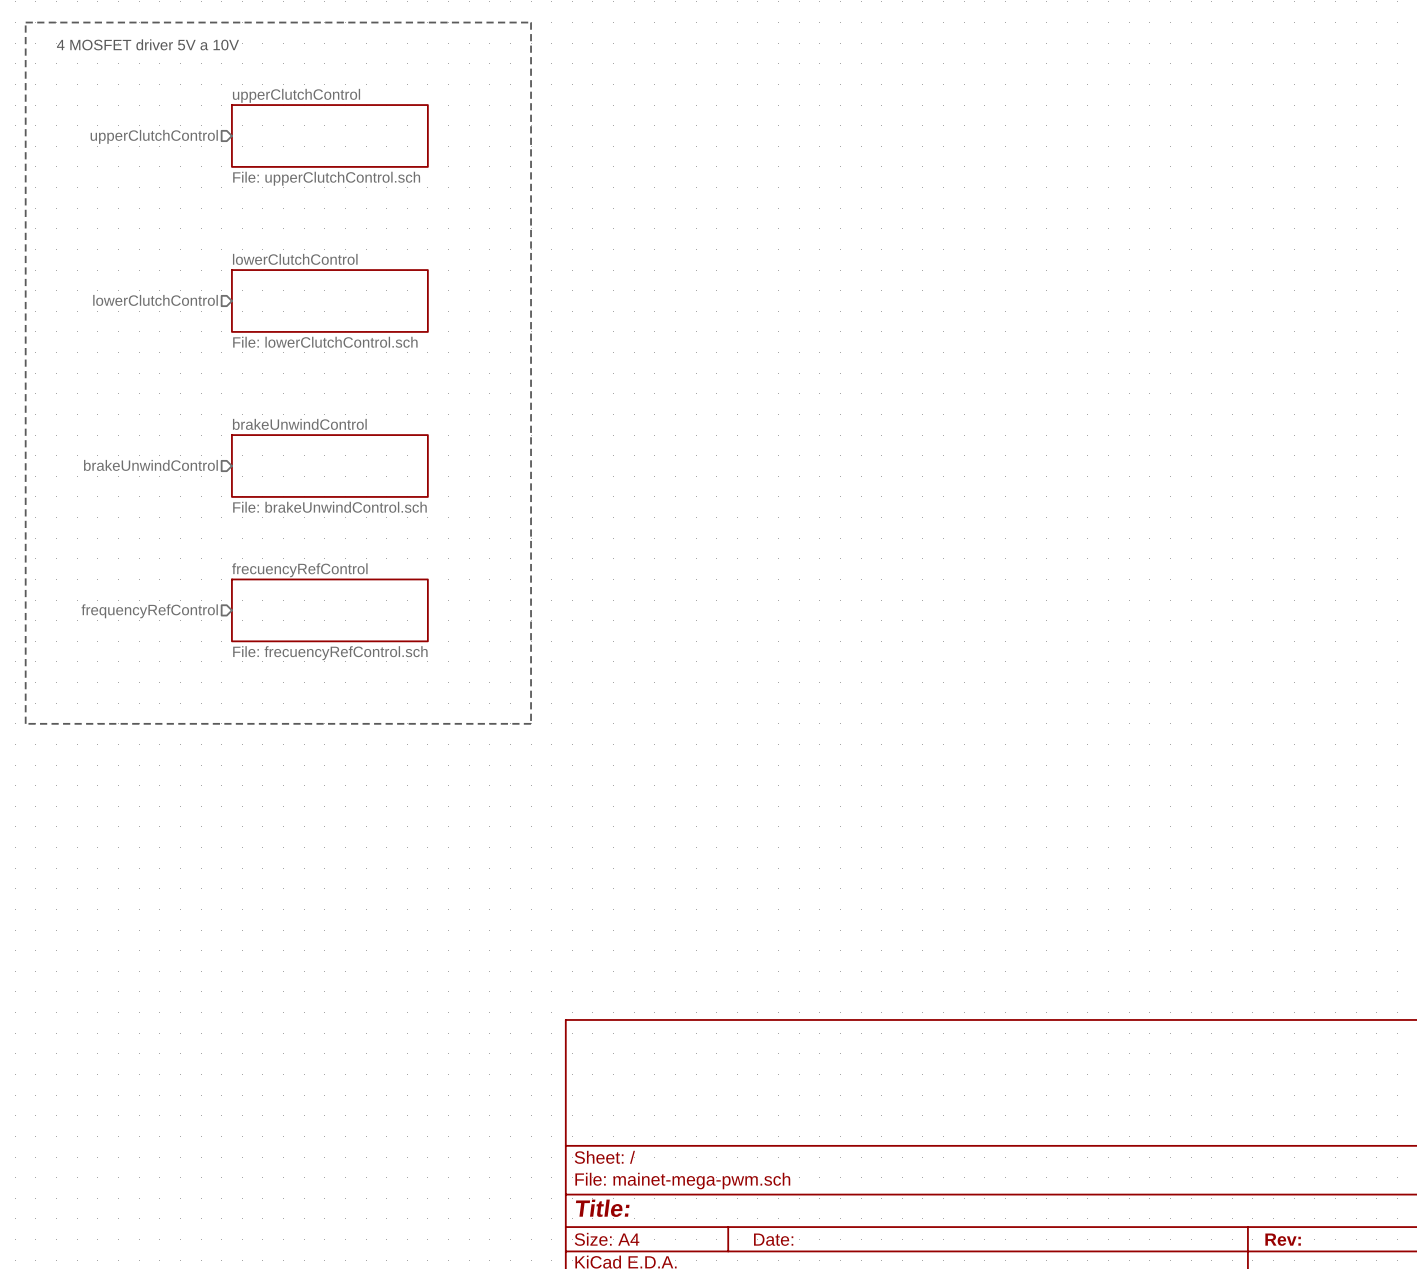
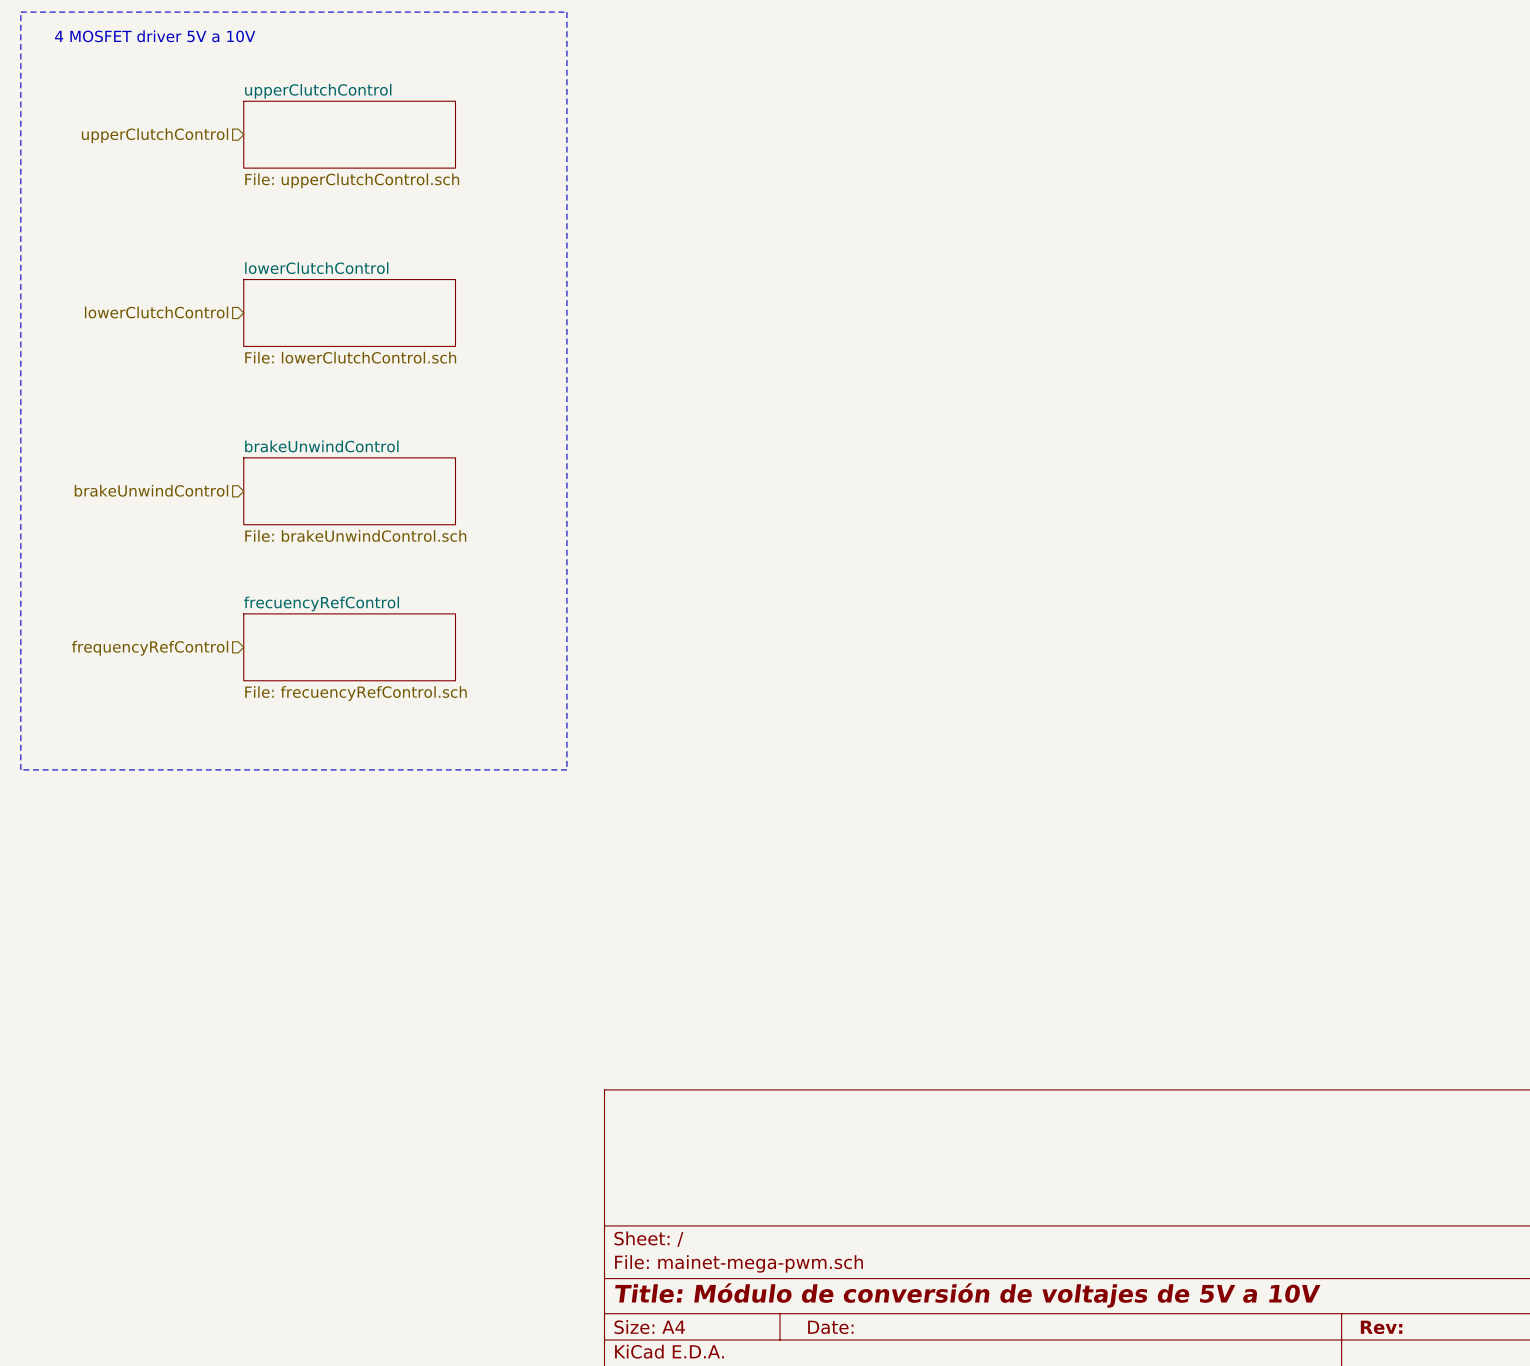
title block: Title: (602, 1208) -> Title: Módulo de conversión de voltajes de 5V a 10V (967, 1295)

